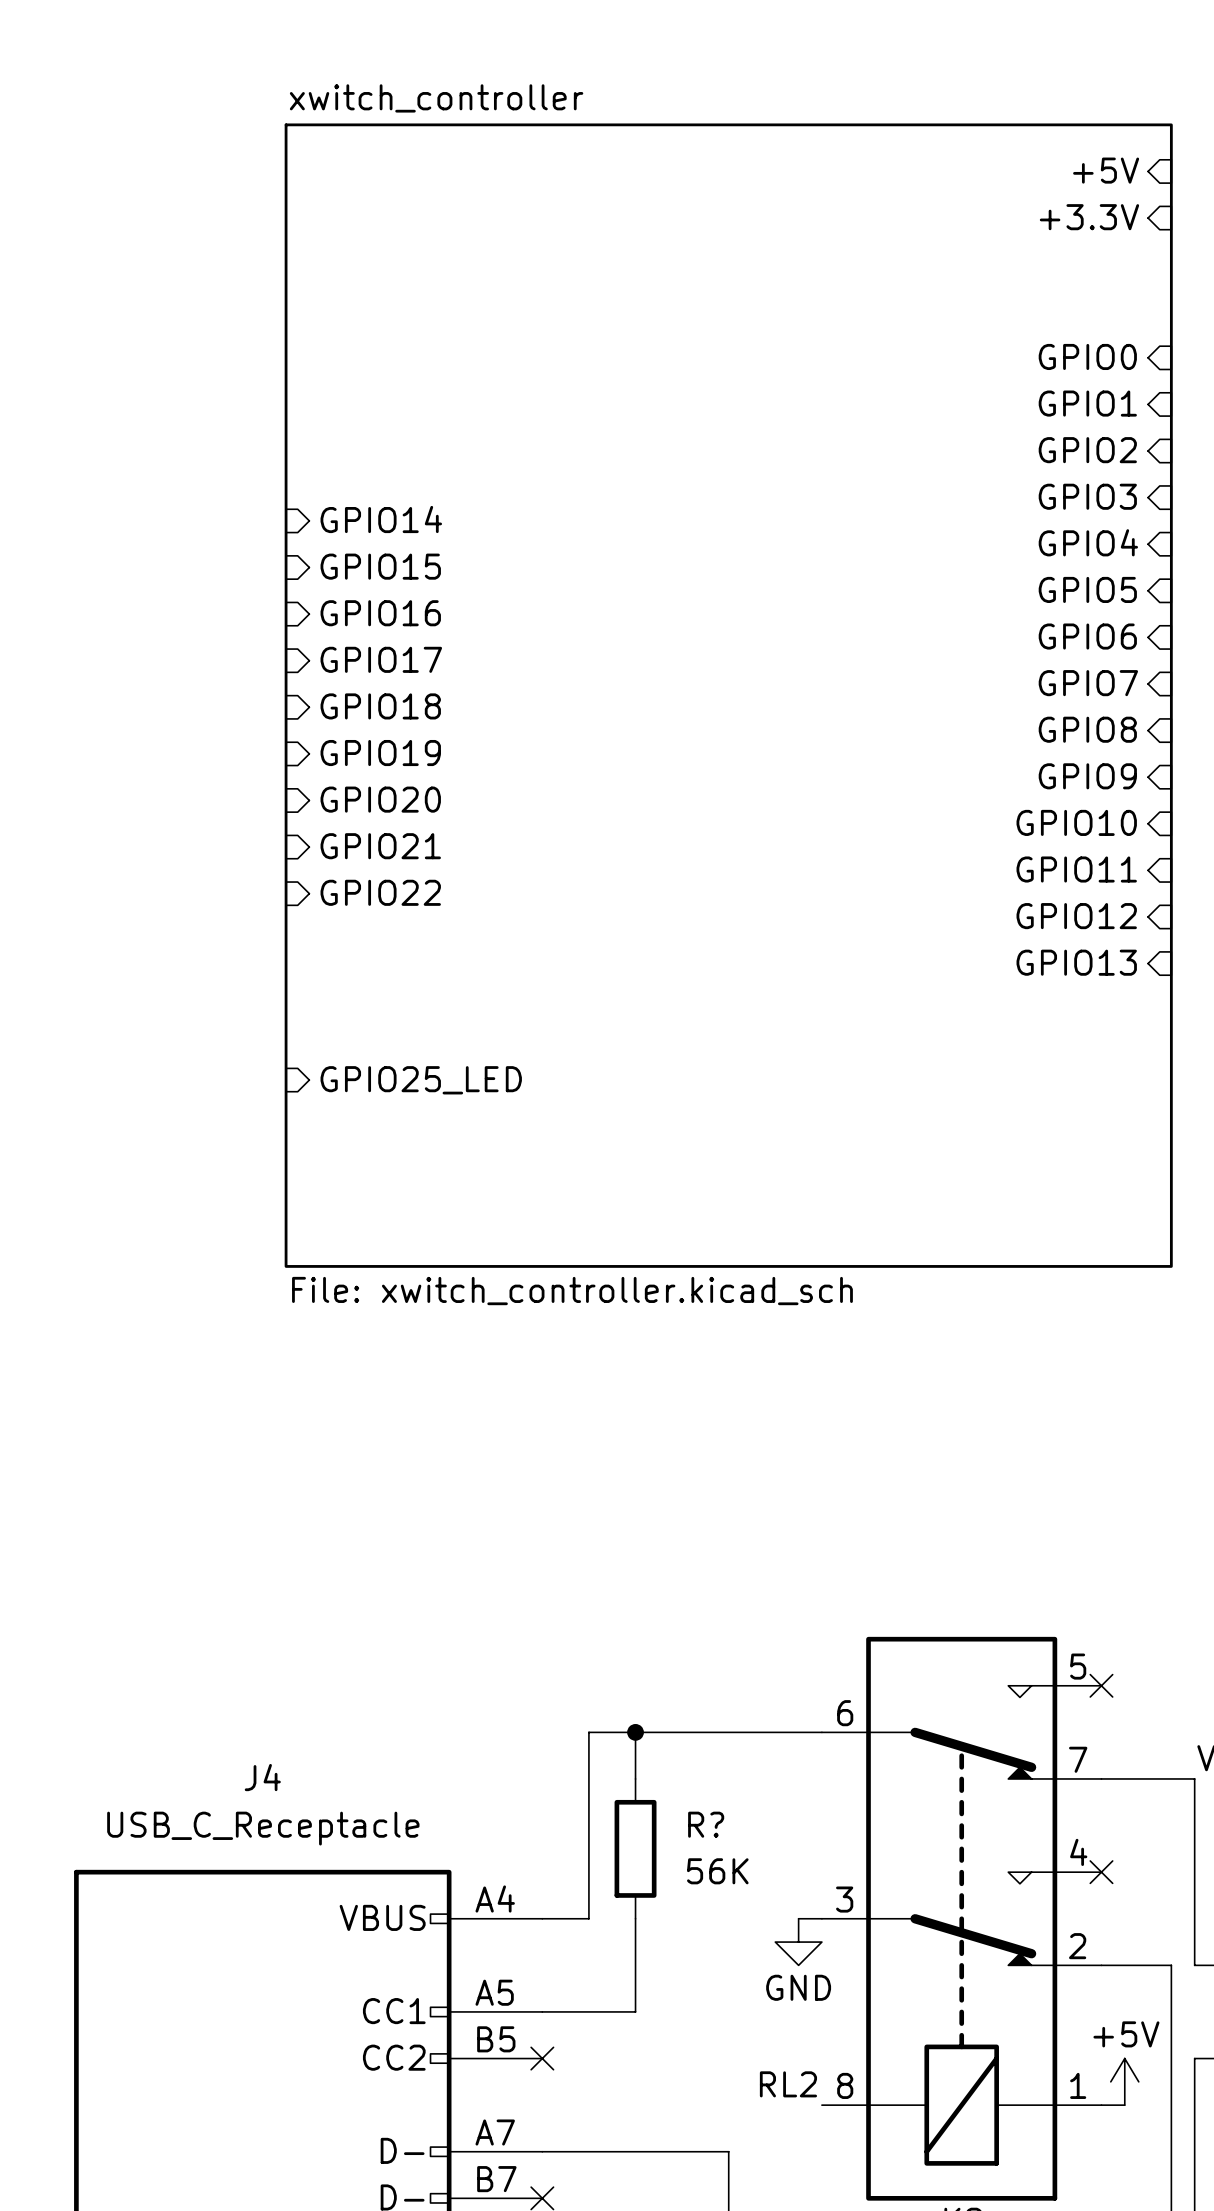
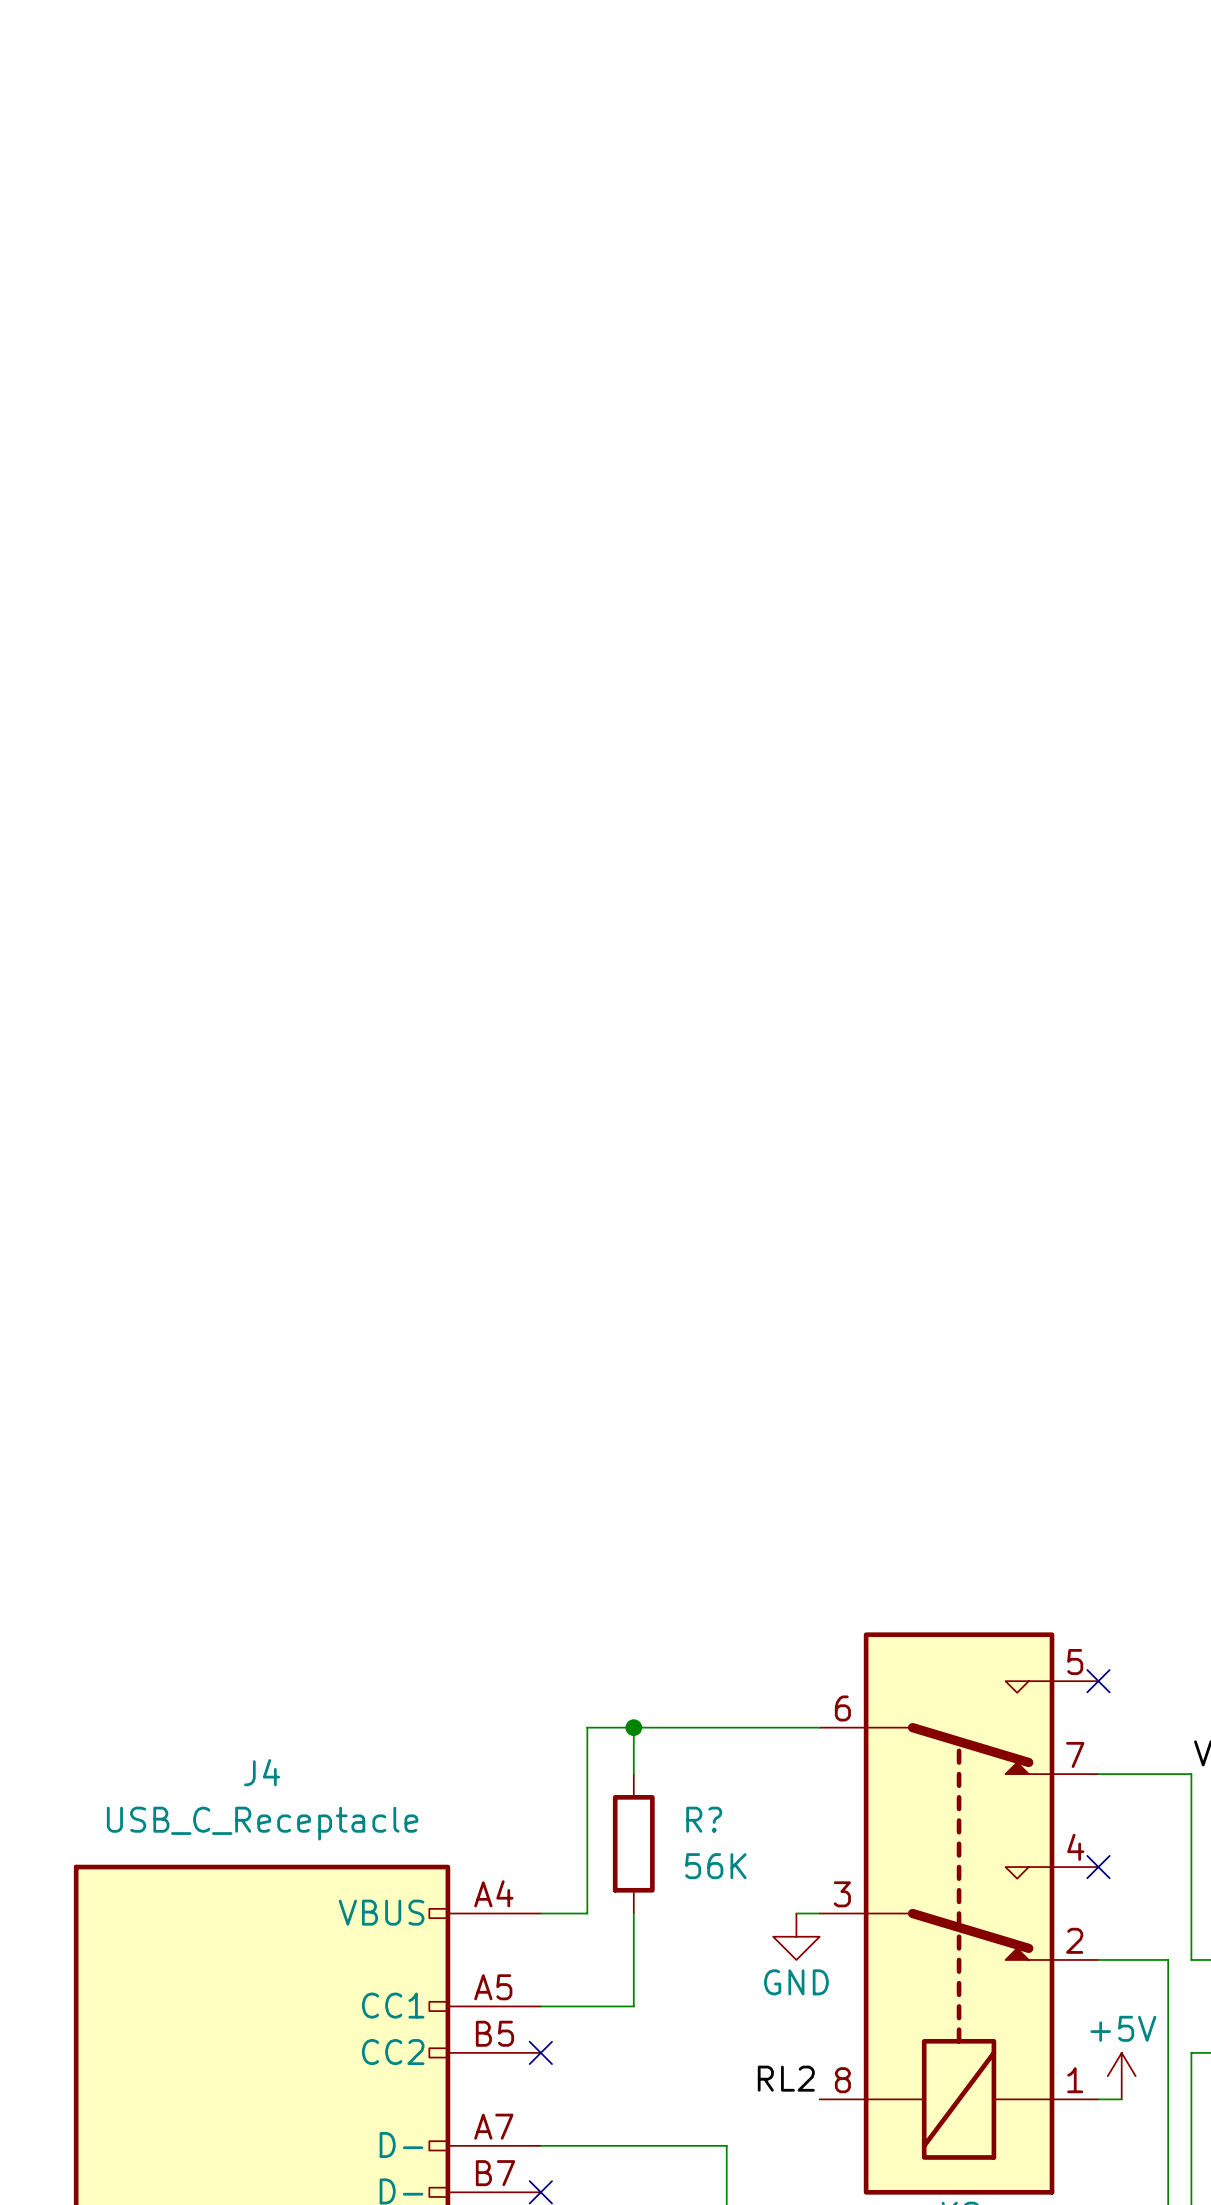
sheet pin: +5V (1106, 170) -> none
sheet pin: +3.3V (1089, 217) -> none
sheet pin: GPIO0 (1087, 356) -> none
sheet pin: GPIO1 (1087, 403) -> none
sheet pin: GPIO2 (1087, 450) -> none
sheet pin: GPIO3 (1087, 496) -> none
sheet pin: GPIO14 (381, 519) -> none
sheet pin: GPIO4 (1088, 542) -> none
sheet pin: GPIO15 (380, 566) -> none
sheet pin: GPIO5 (1087, 589) -> none
sheet pin: GPIO16 (380, 613) -> none
sheet pin: GPIO6 (1087, 636) -> none
sheet pin: GPIO17 (381, 659) -> none
sheet pin: GPIO7 (1088, 683) -> none
sheet xwitch_controller: File: xwitch_controller.kicad_sch (728, 695) -> none
sheet pin: GPIO18 (380, 706) -> none
sheet pin: GPIO8 (1087, 729) -> none
sheet pin: GPIO19 (380, 753) -> none
sheet pin: GPIO9 (1087, 776) -> none
sheet pin: GPIO20 (380, 799) -> none
sheet pin: GPIO10 (1076, 822) -> none
sheet pin: GPIO21 (380, 846) -> none
sheet pin: GPIO11 (1076, 869) -> none
sheet pin: GPIO22 (380, 892) -> none
sheet pin: GPIO12 (1076, 916) -> none
sheet pin: GPIO13 (1076, 962) -> none
sheet pin: GPIO25_LED (421, 1080) -> none

